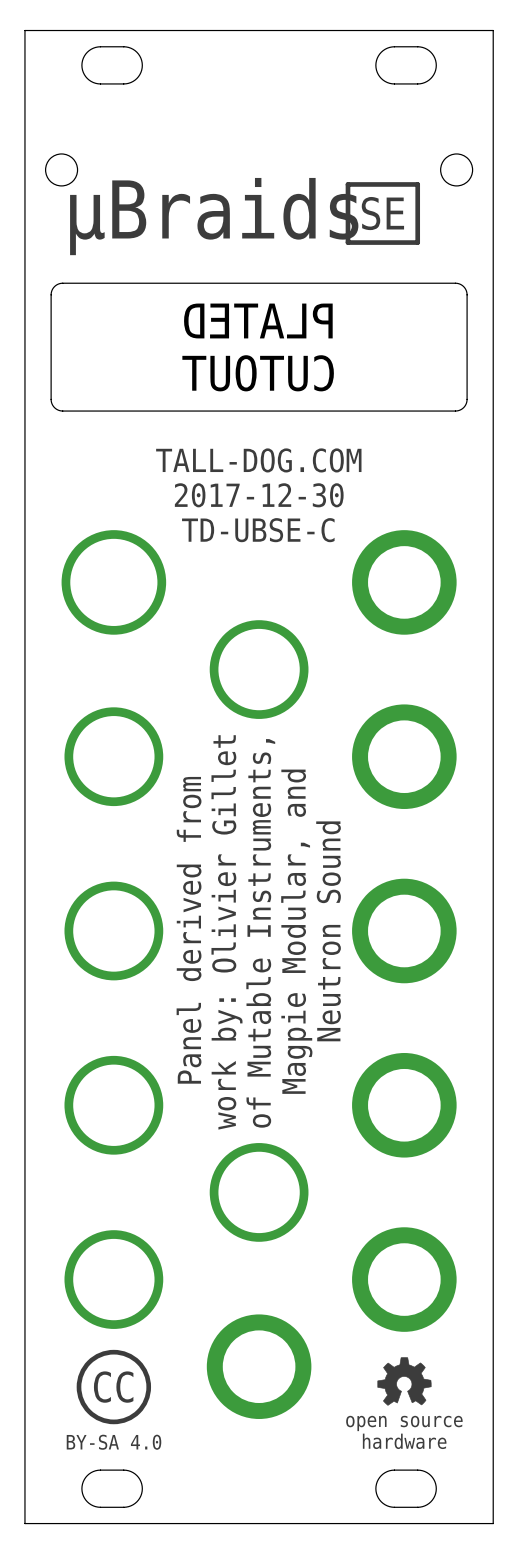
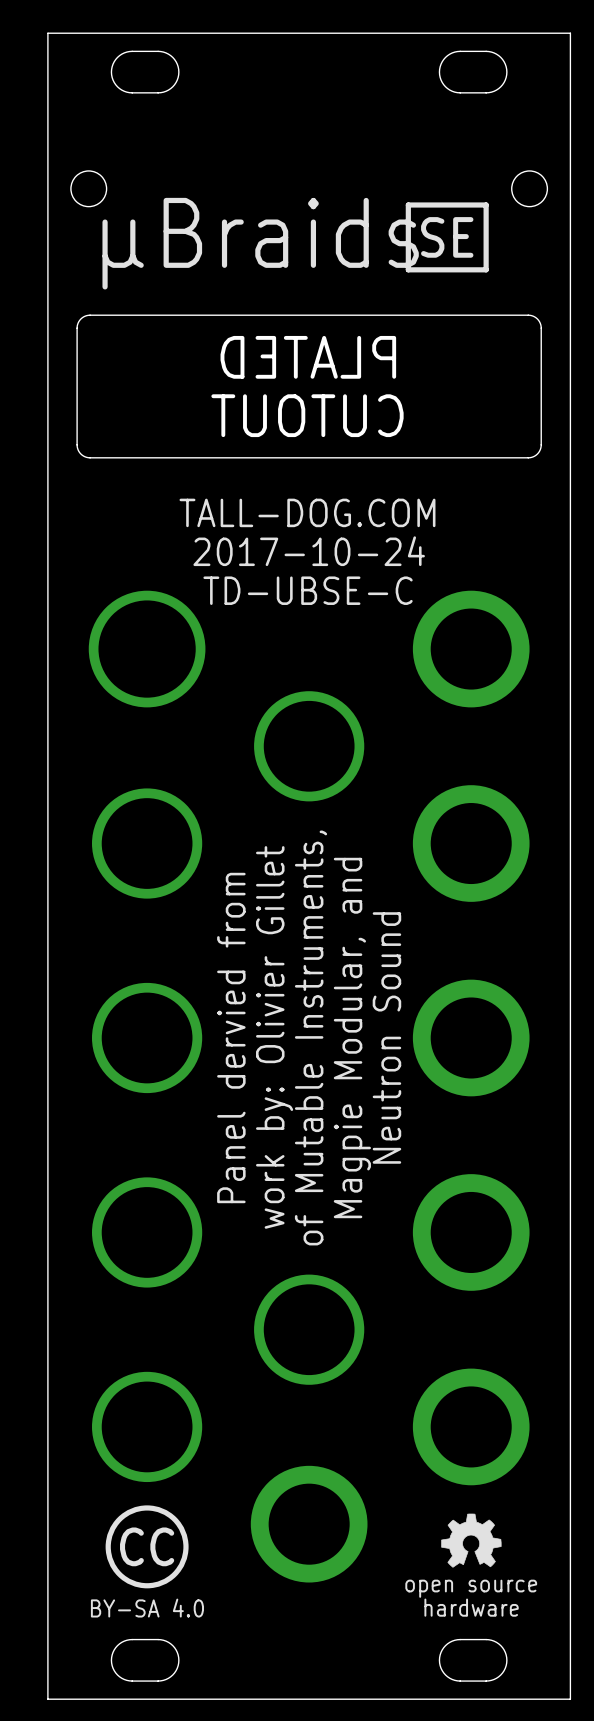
text: 2017-12-30 (259, 495) -> 2017-10-24 (309, 551)
text: Panel derived from (189, 930) -> Panel dervied from (231, 1037)

